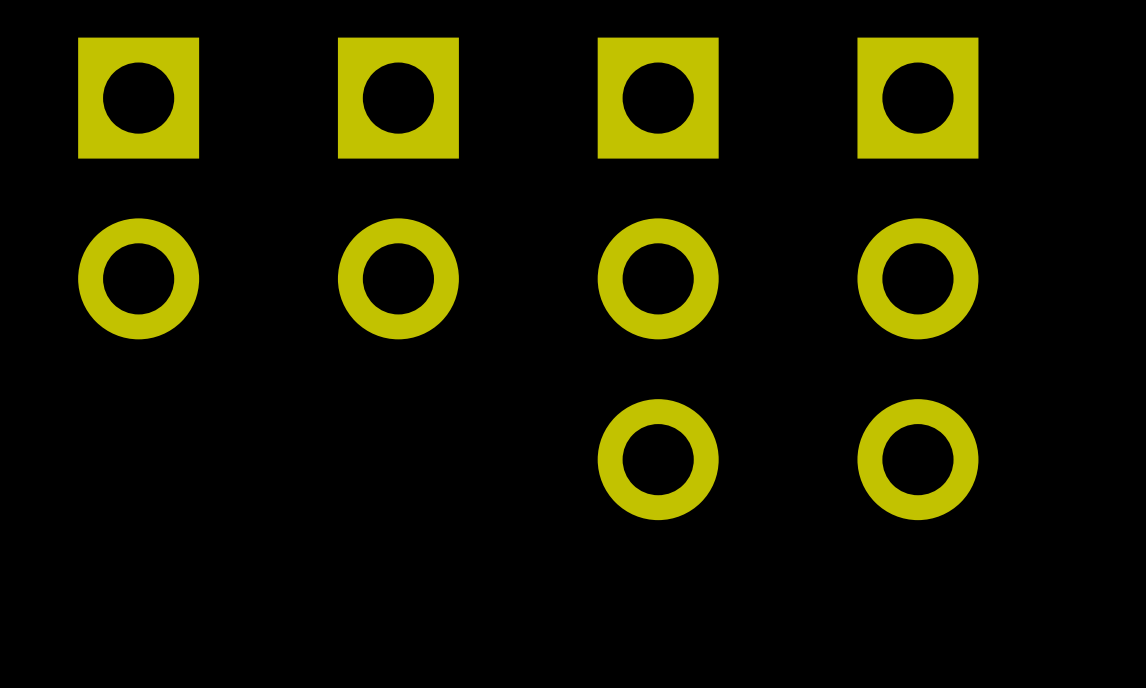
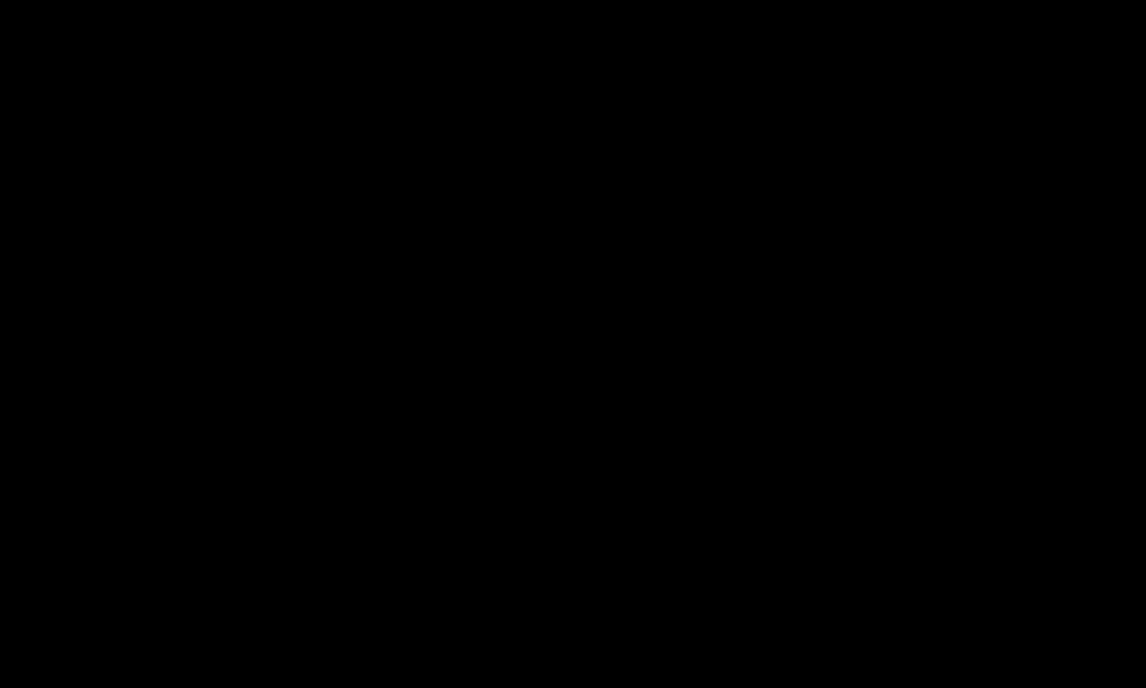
part: (138, 188) -> none
part: (398, 188) -> none
part: (658, 278) -> none
part: (917, 278) -> none

